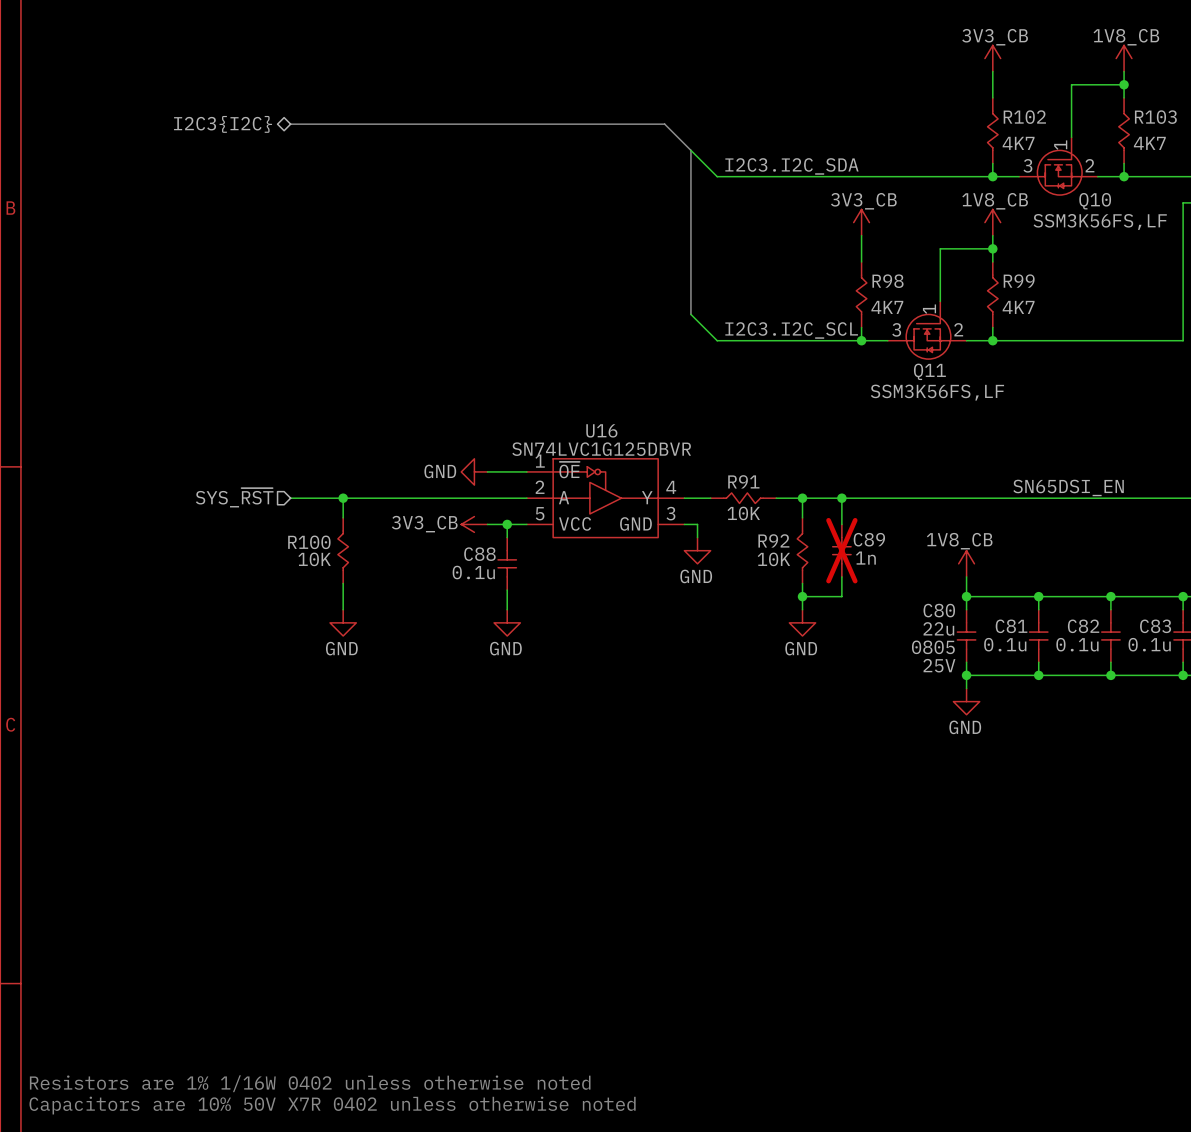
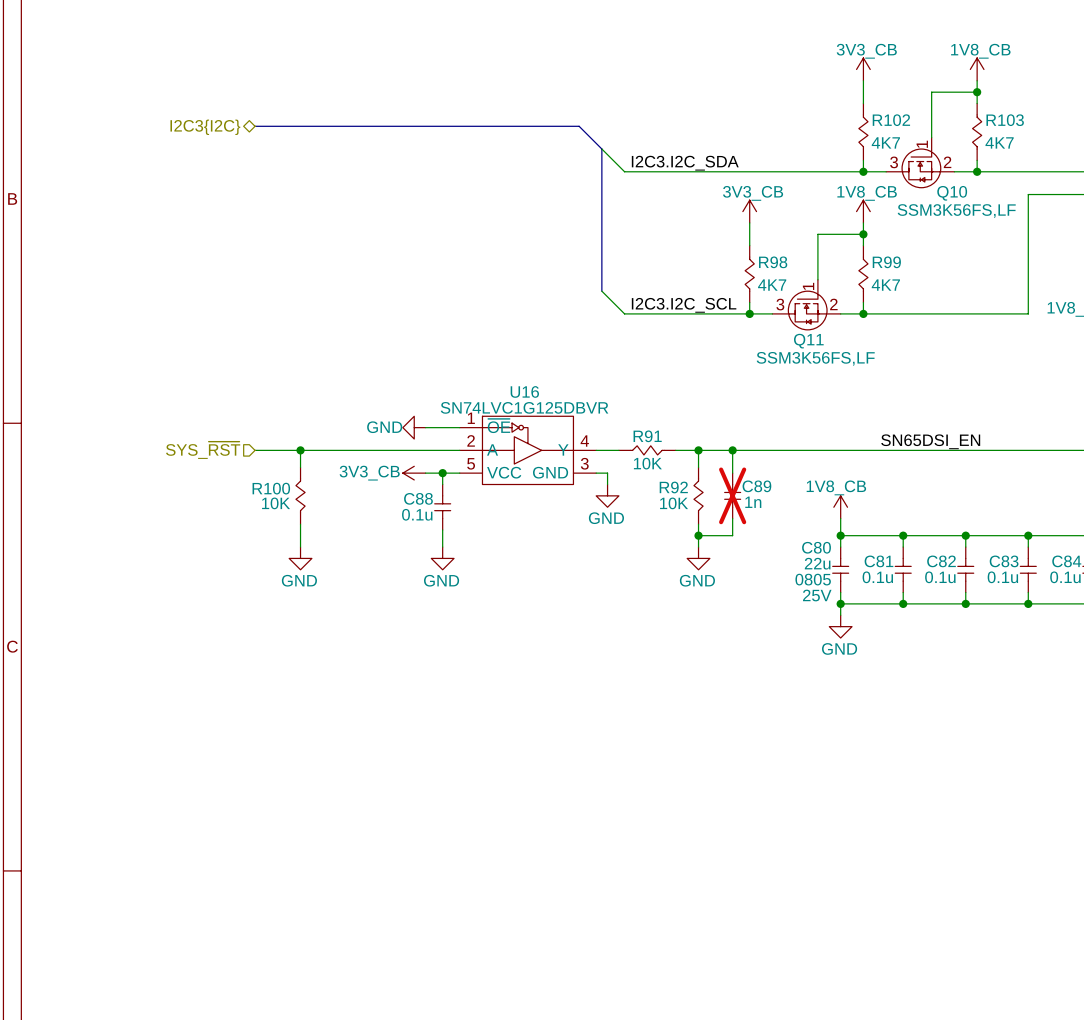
text: Resistors are 1% 1/16W 0402 unless otherwise noted (310, 1083) -> none
text: Capacitors are 10% 50V X7R 0402 unless otherwise noted (332, 1105) -> none

